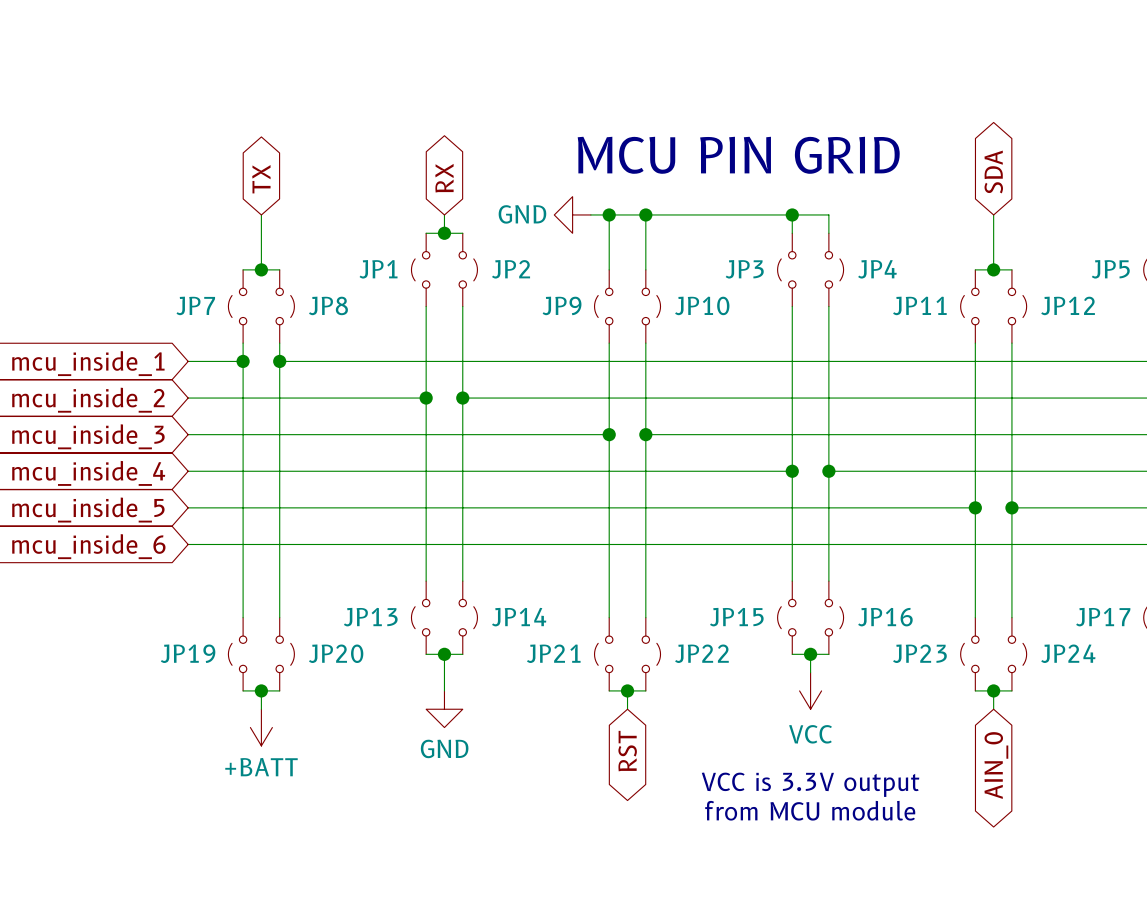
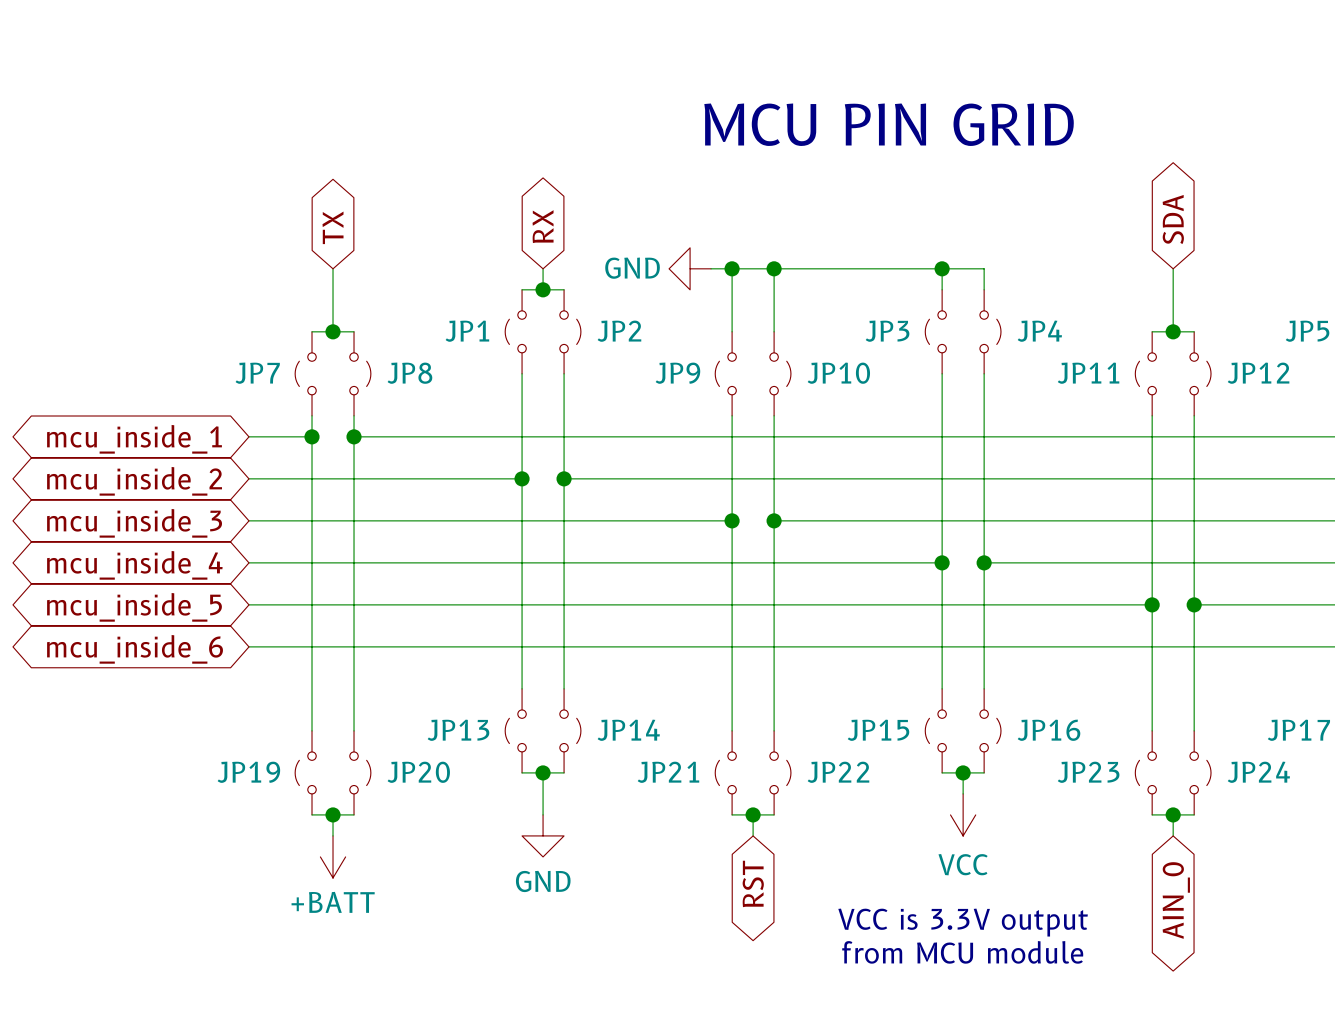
text position: MCU PIN GRID (738, 155) -> MCU PIN GRID (889, 124)

